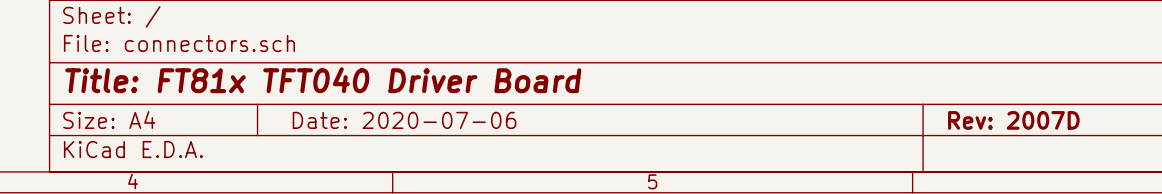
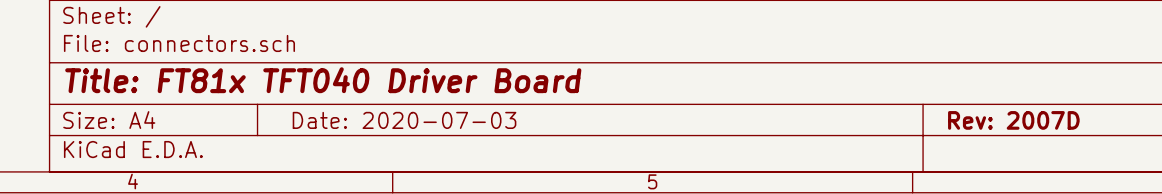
title block: Date: 2020-07-06 (404, 120) -> Date: 2020-07-03 (404, 120)

